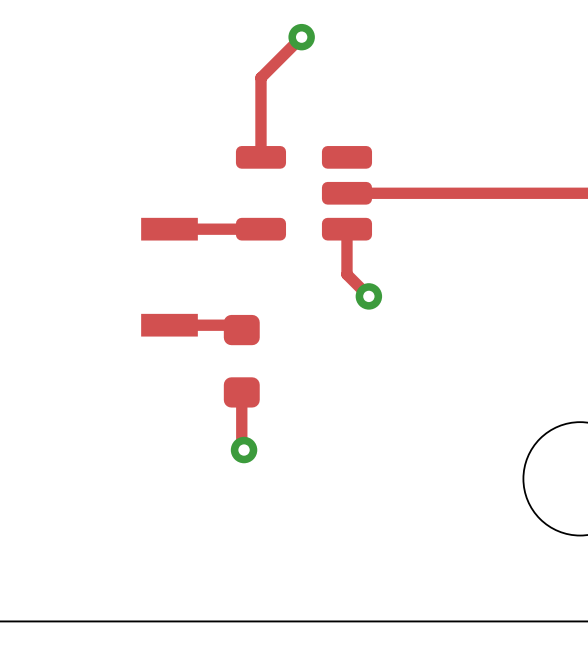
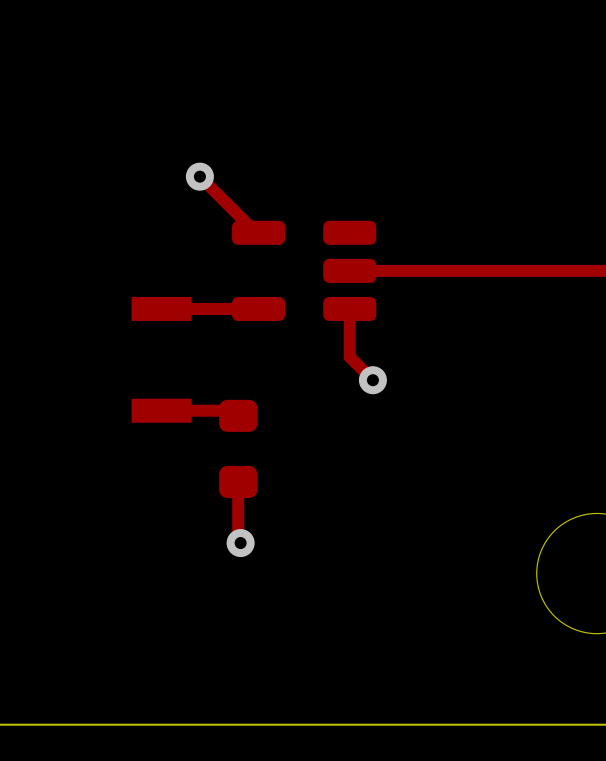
top track: (301, 37) (260, 77) (260, 157) -> (199, 176) (256, 232) (258, 232)
via position: (301, 37) -> (199, 176)

